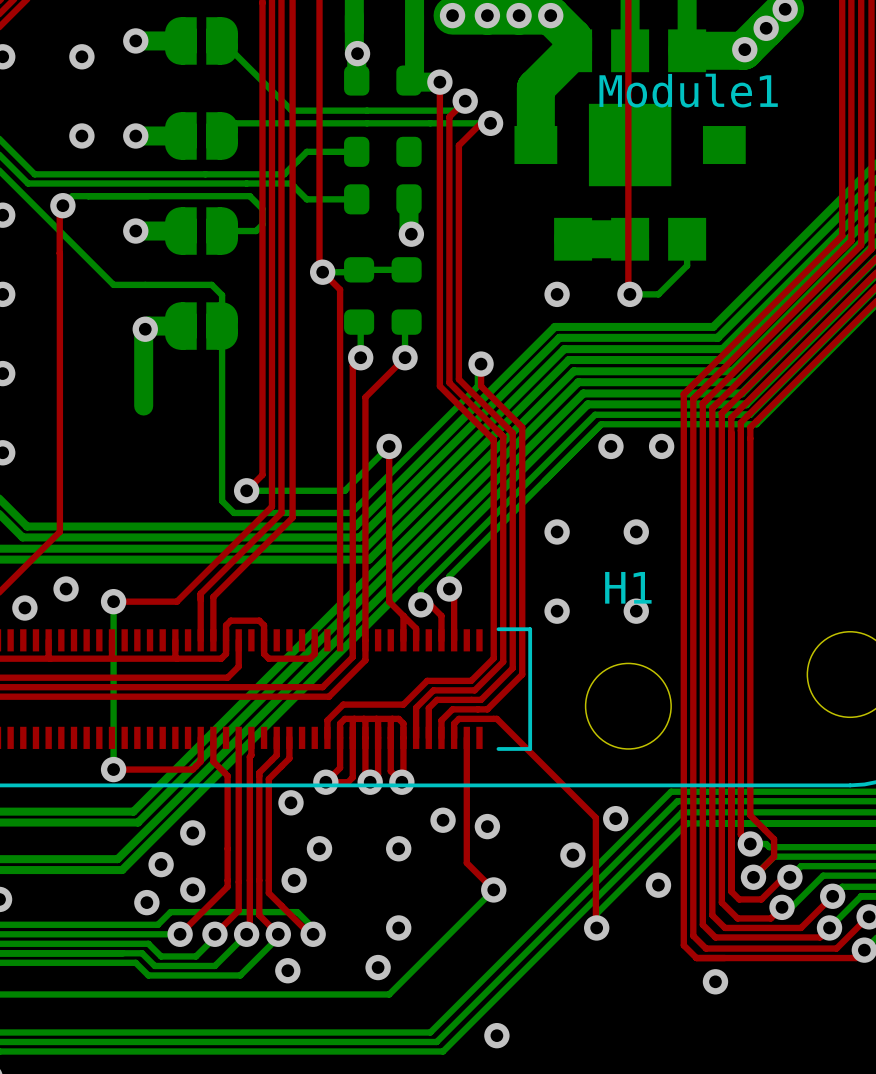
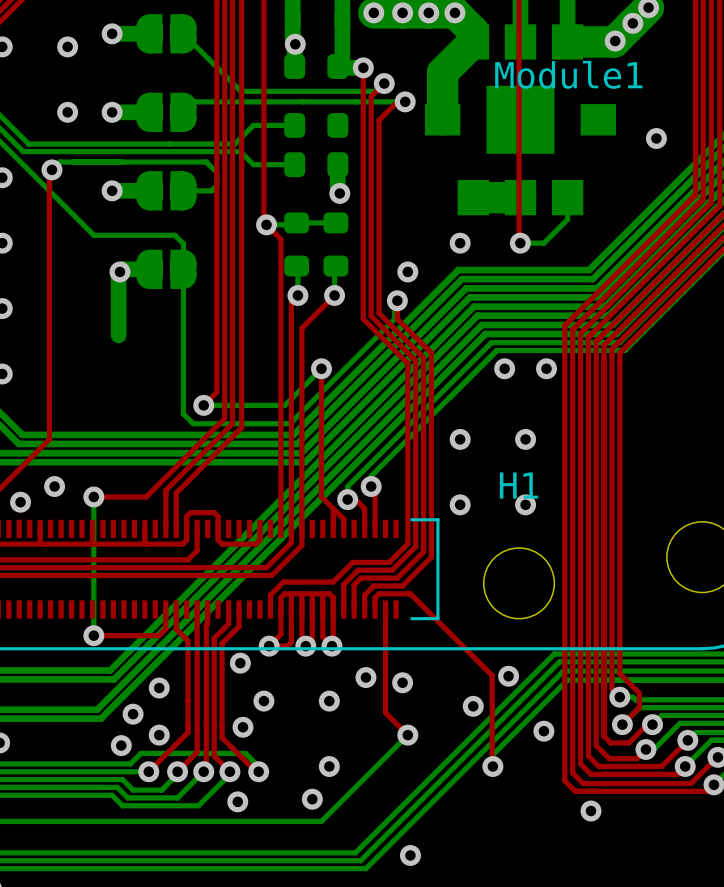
via: none -> (656, 138)
via: none -> (407, 271)

